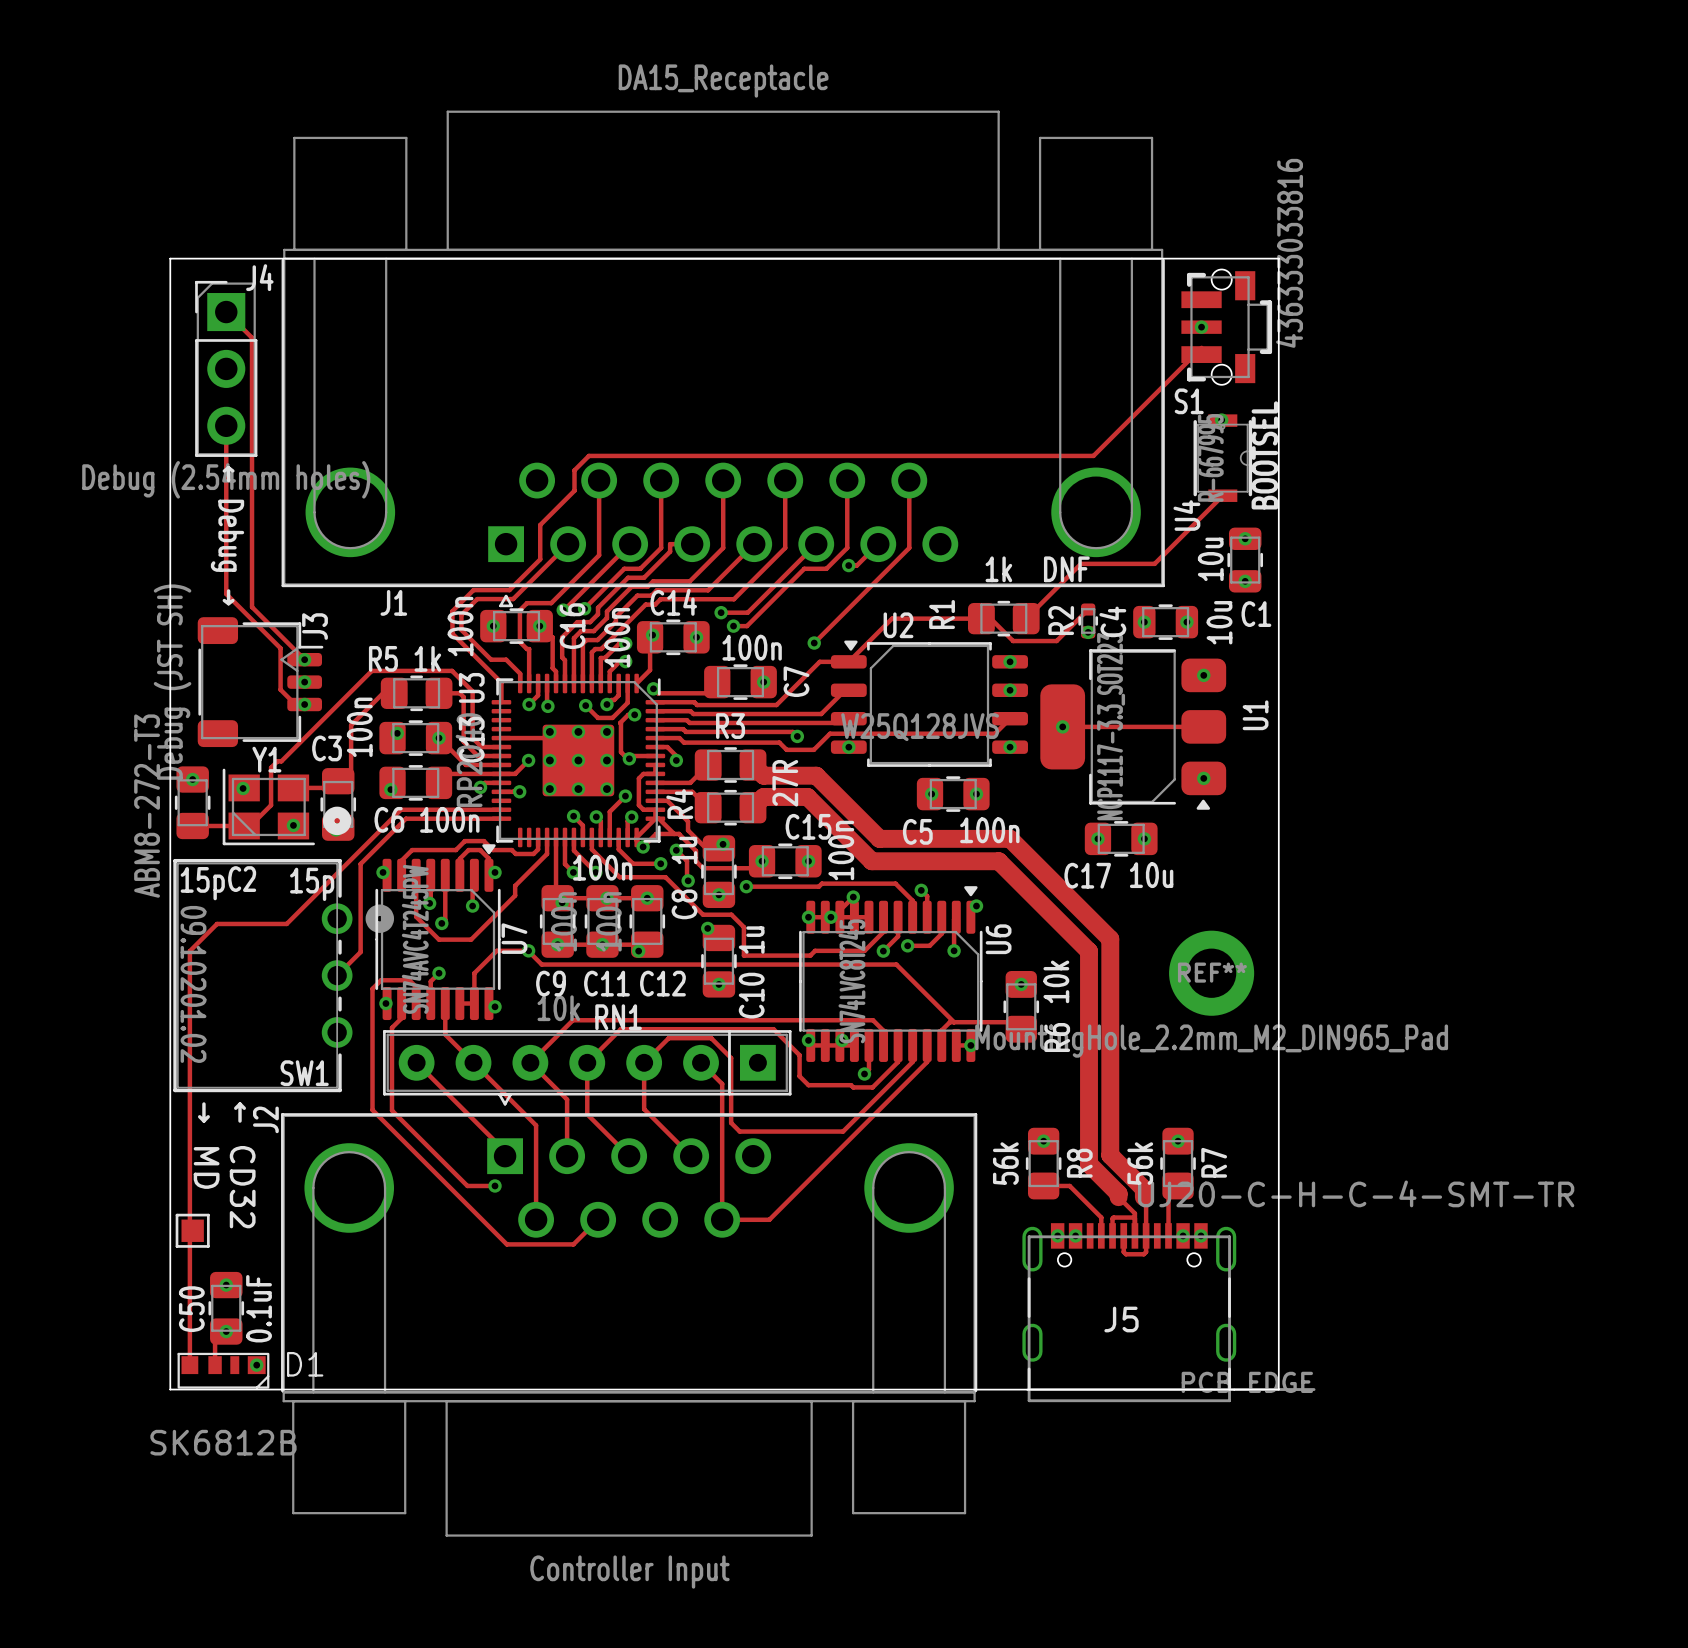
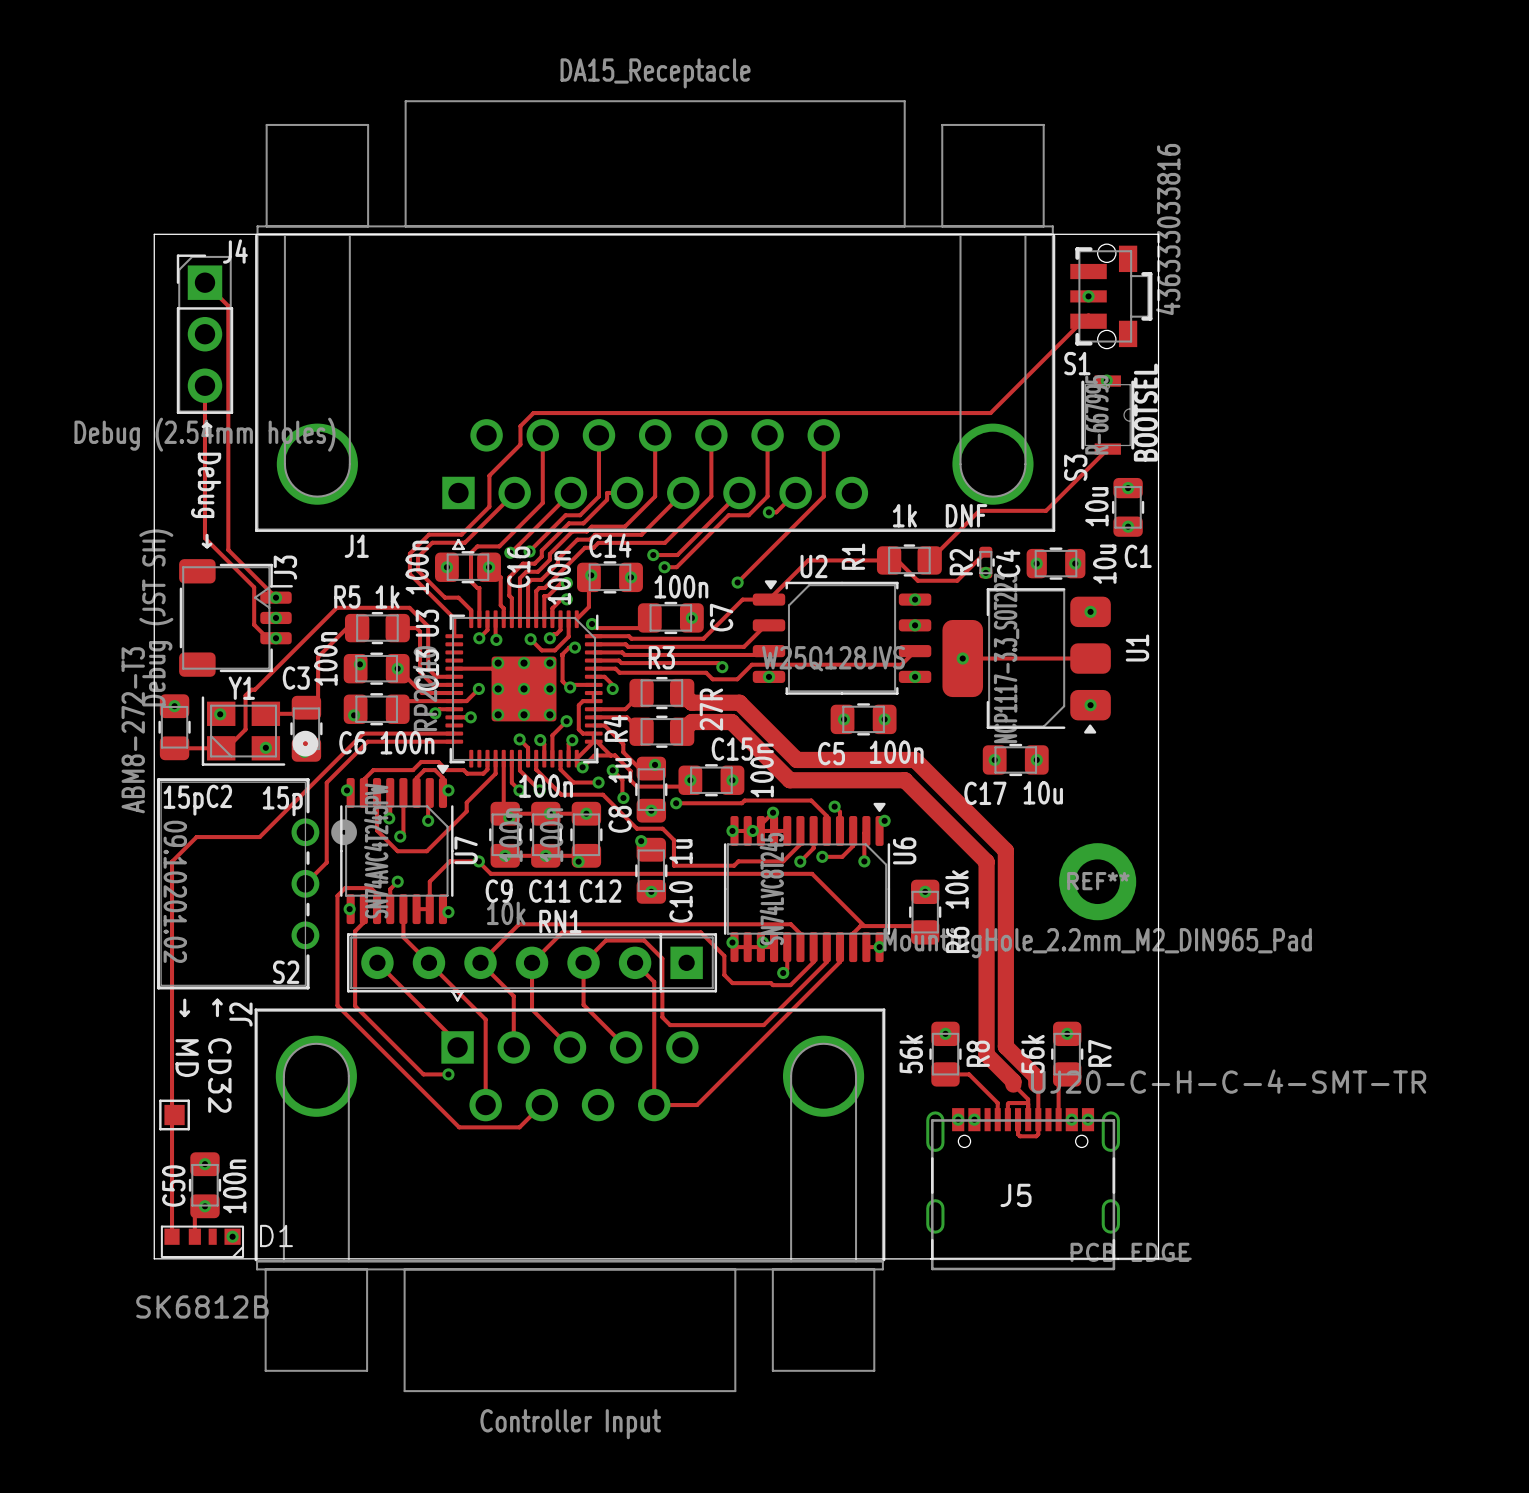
U4 name: U4 (1186, 515) -> S3 (1075, 467)
SW1 name: SW1 (304, 1073) -> S2 (286, 972)
C50 value: 0.1uF (259, 1308) -> 100n (234, 1186)

